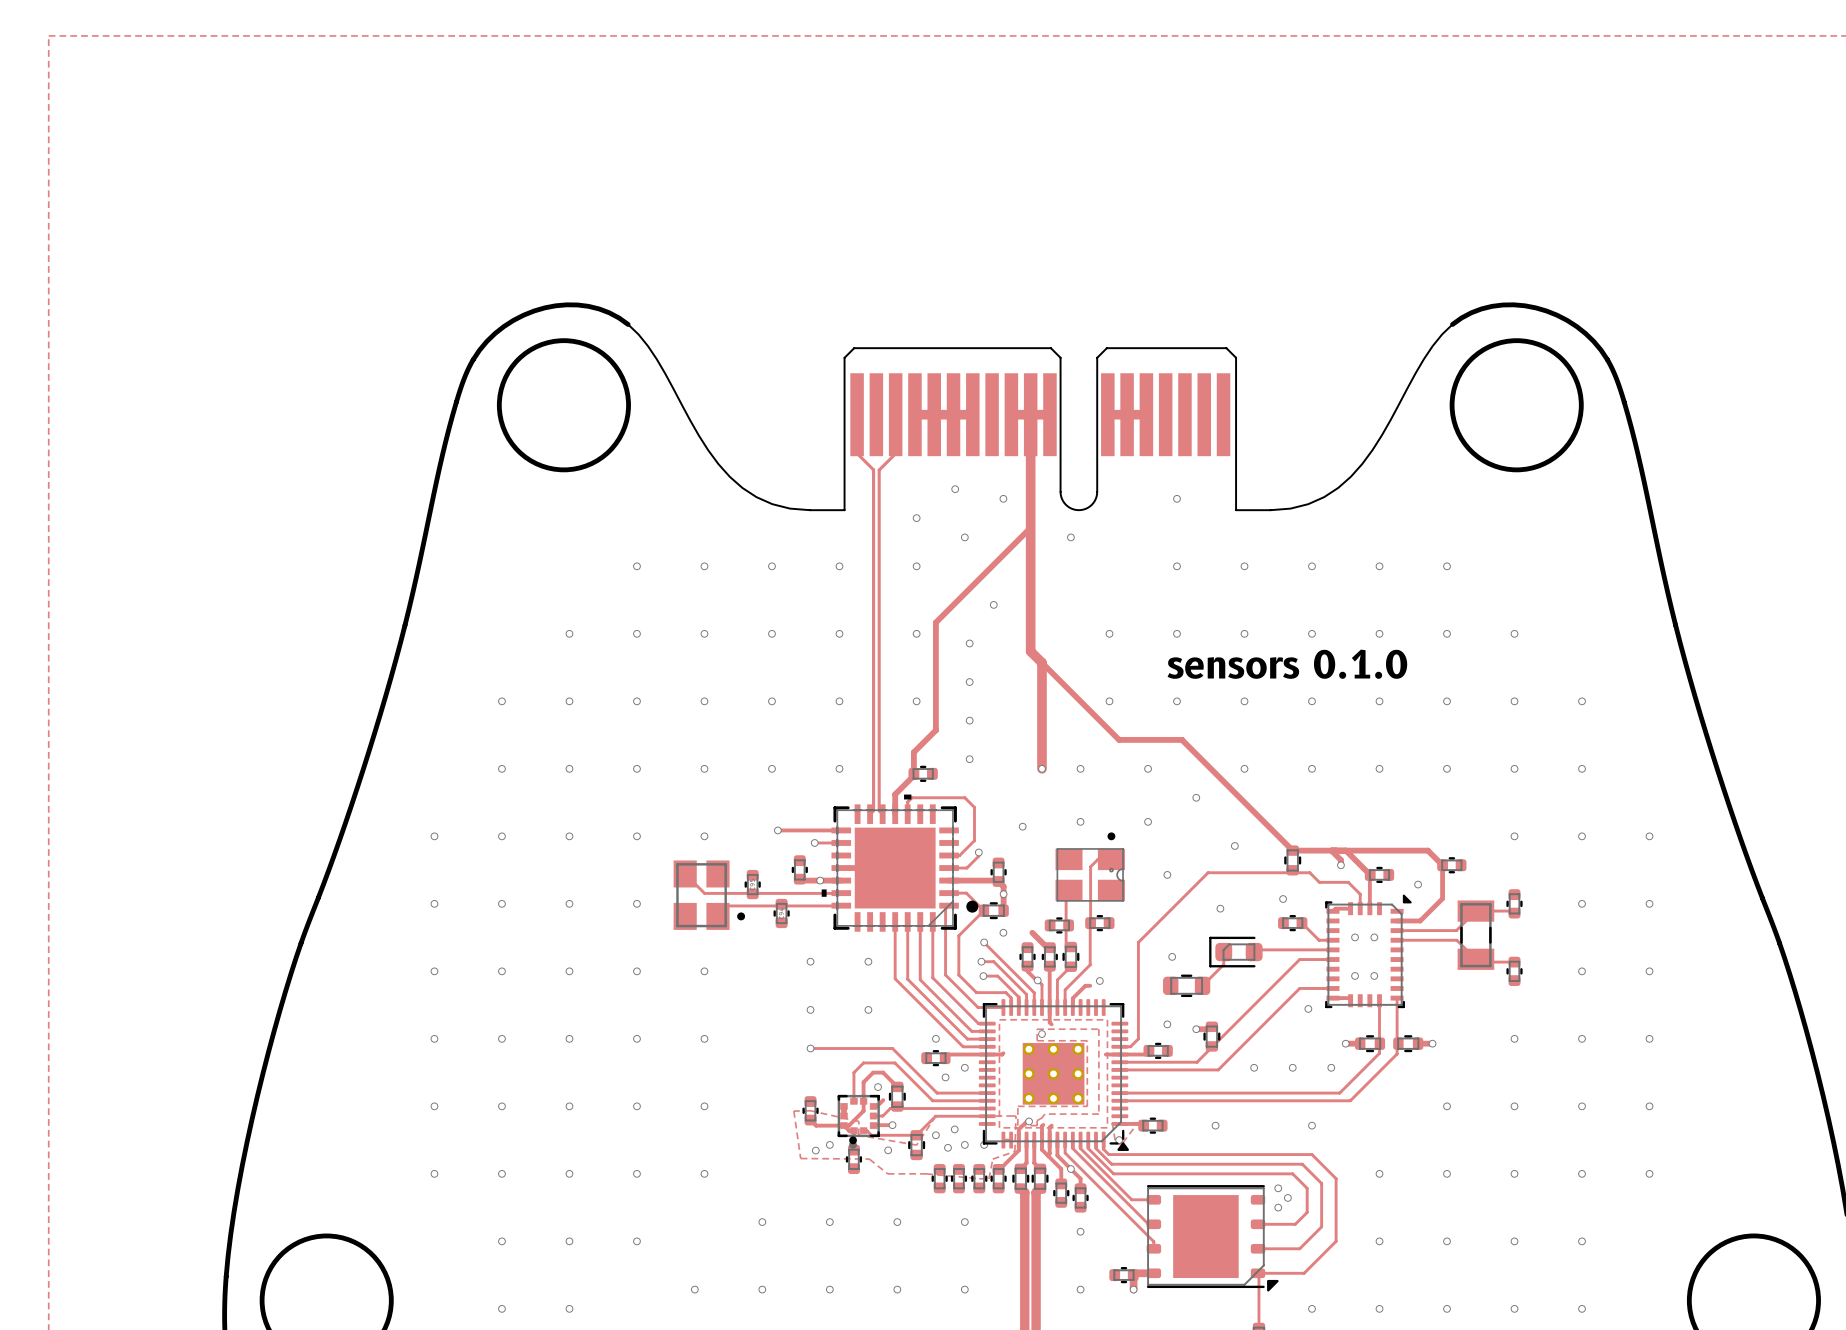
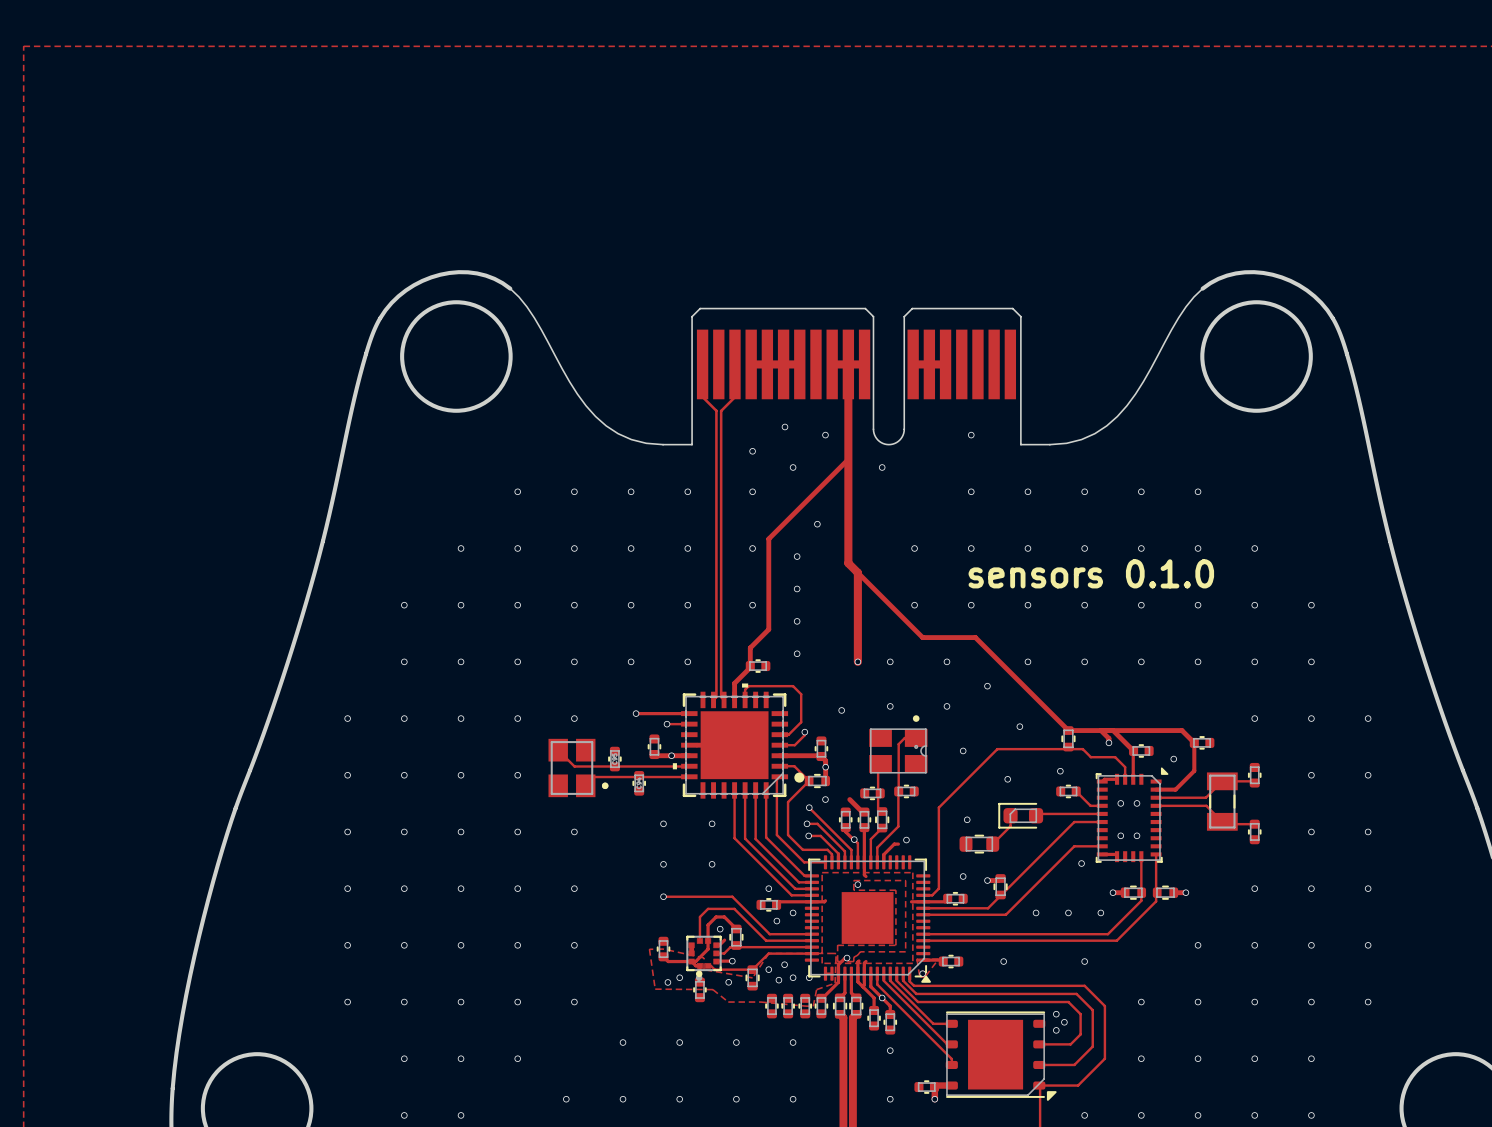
part: (1028, 1049) -> none
part: (1053, 1049) -> none
part: (1078, 1049) -> none
part: (1028, 1073) -> none
part: (1053, 1073) -> none
part: (1078, 1073) -> none
part: (1028, 1098) -> none
part: (1053, 1098) -> none
part: (1078, 1098) -> none

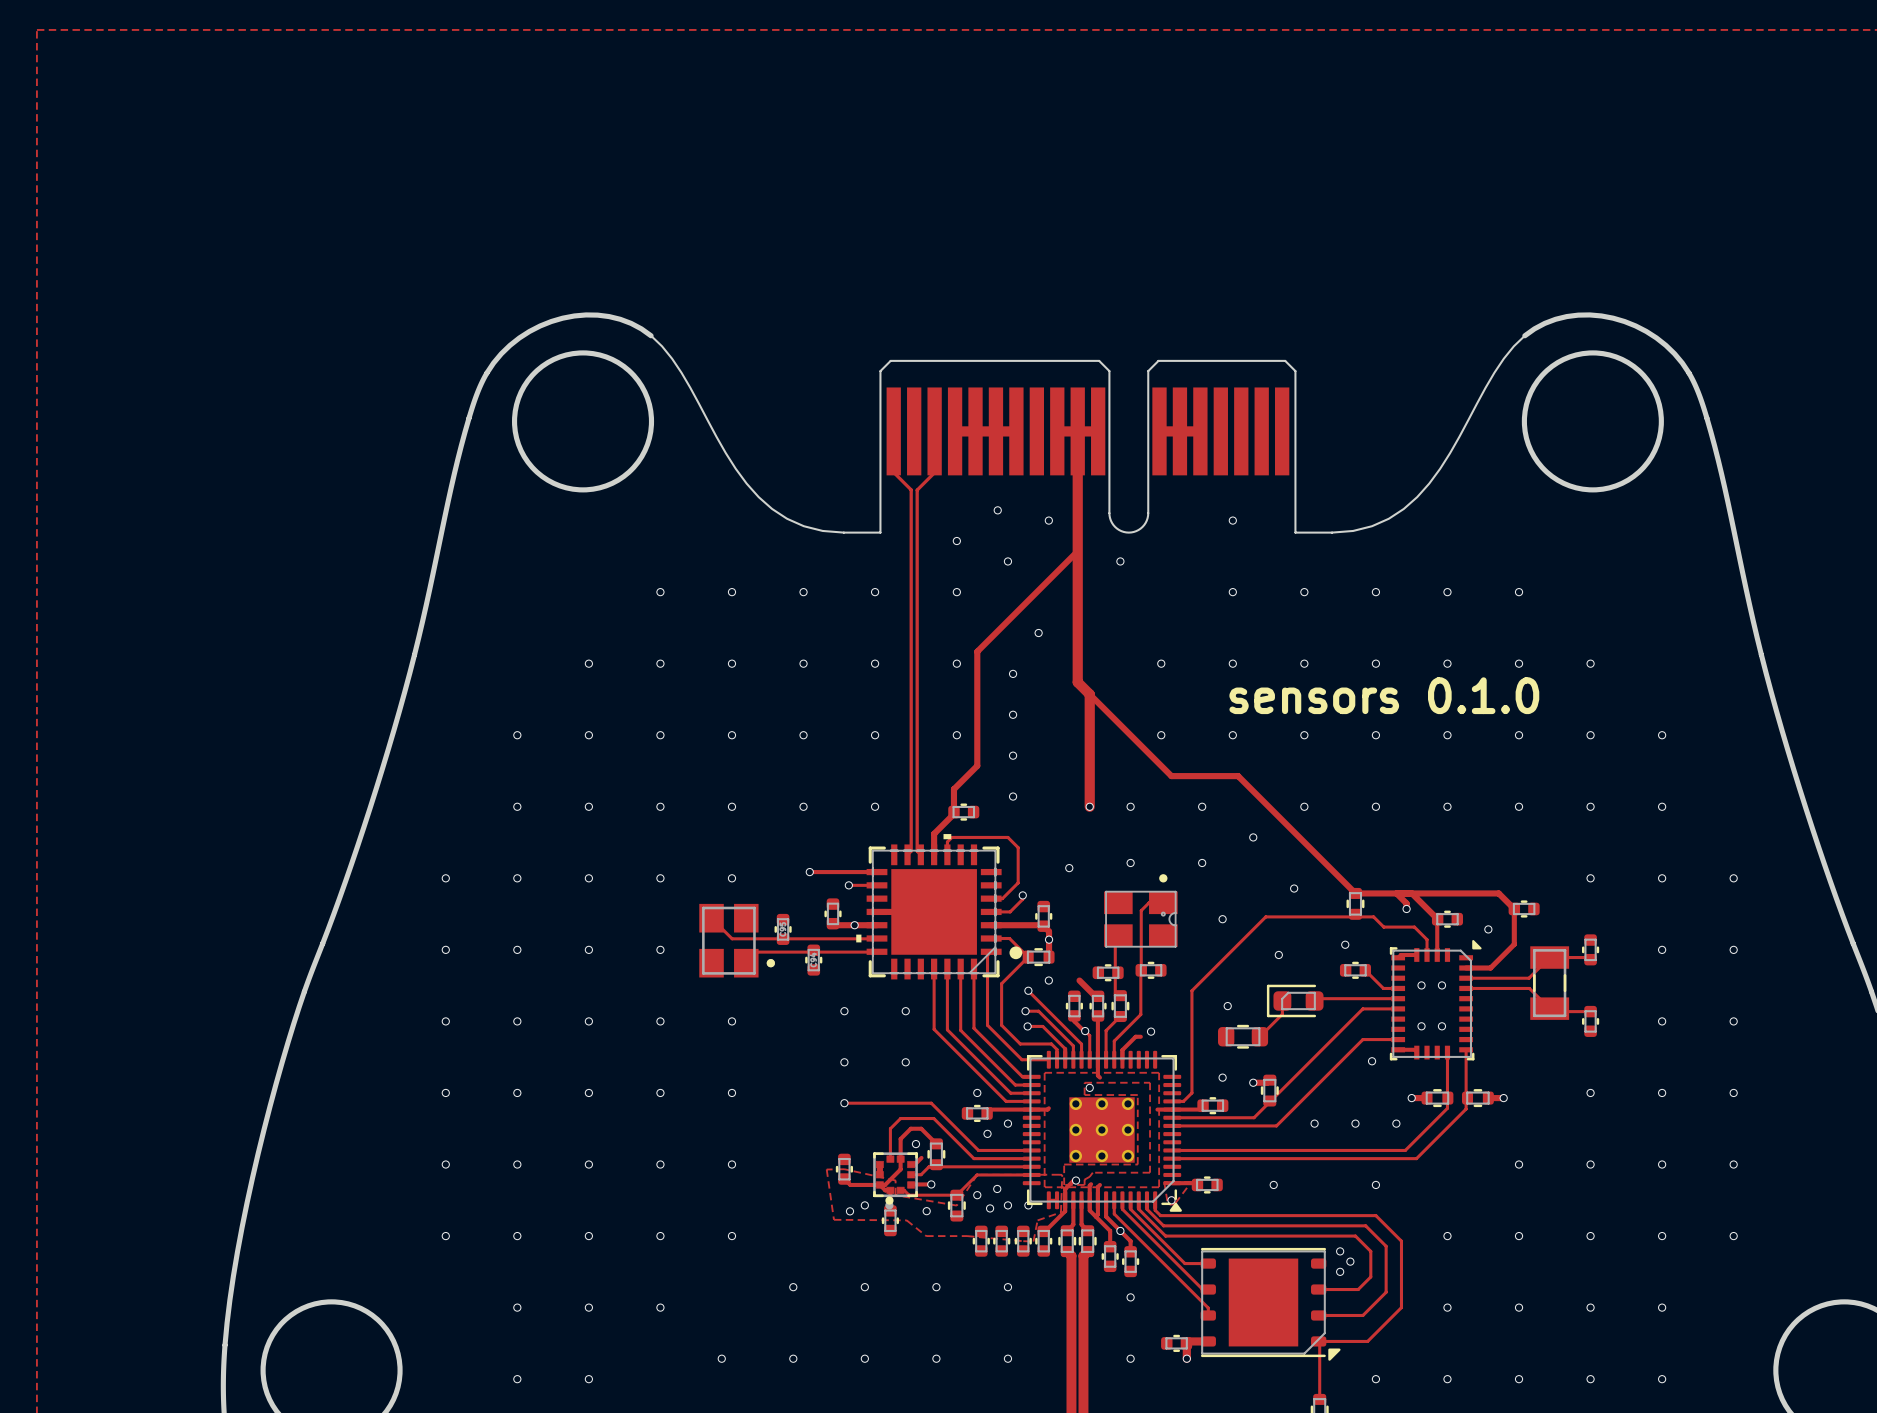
part: none -> (1075, 1103)
part: none -> (1101, 1103)
part: none -> (1127, 1103)
part: none -> (1075, 1129)
part: none -> (1101, 1129)
part: none -> (1127, 1129)
part: none -> (1075, 1156)
part: none -> (1101, 1156)
part: none -> (1127, 1156)

